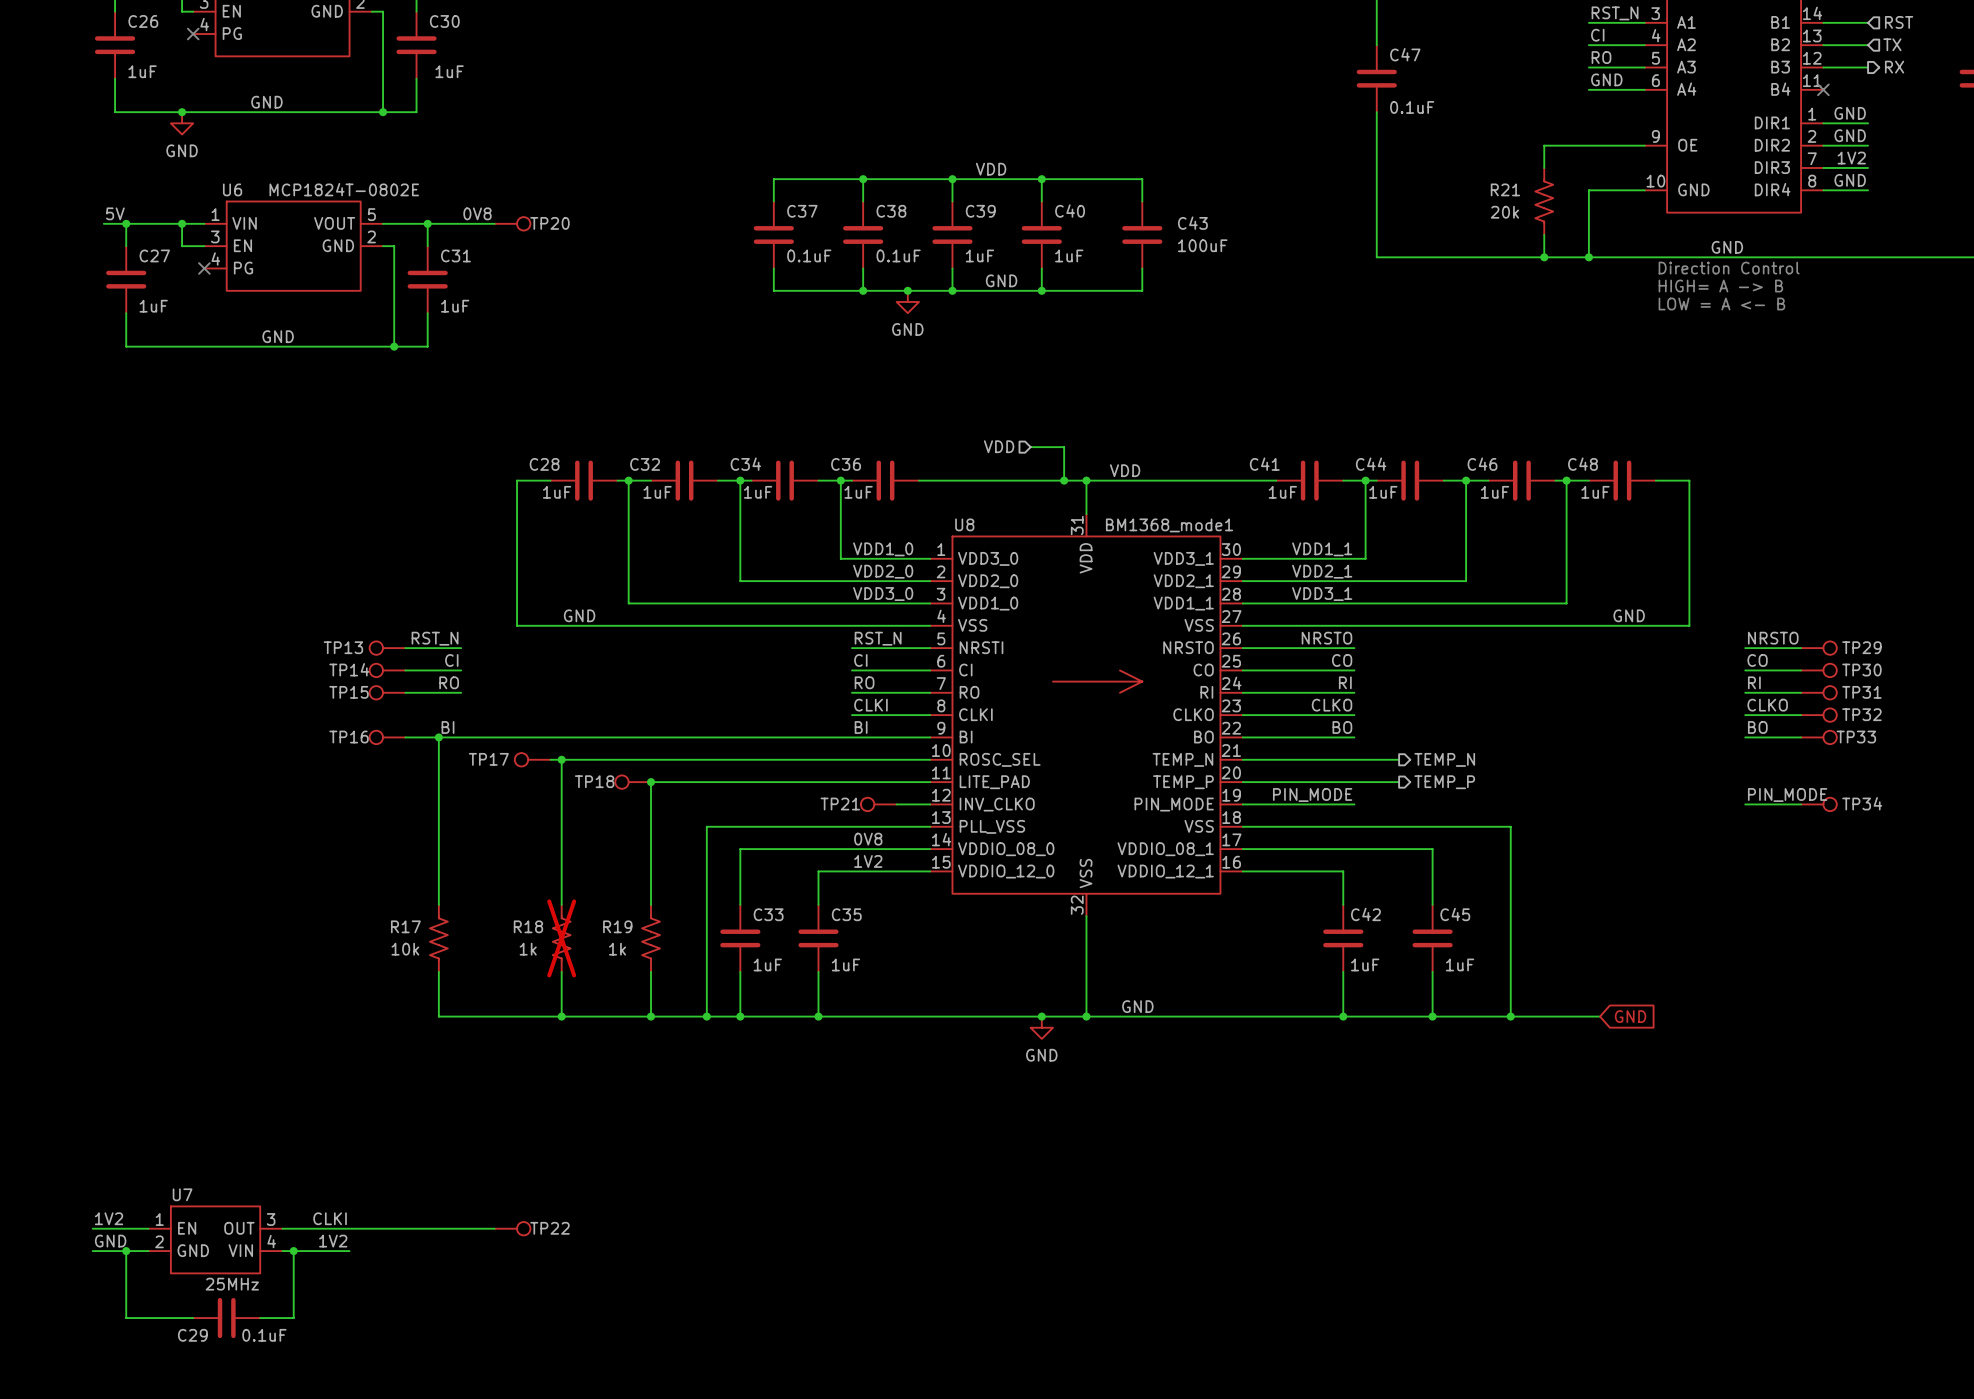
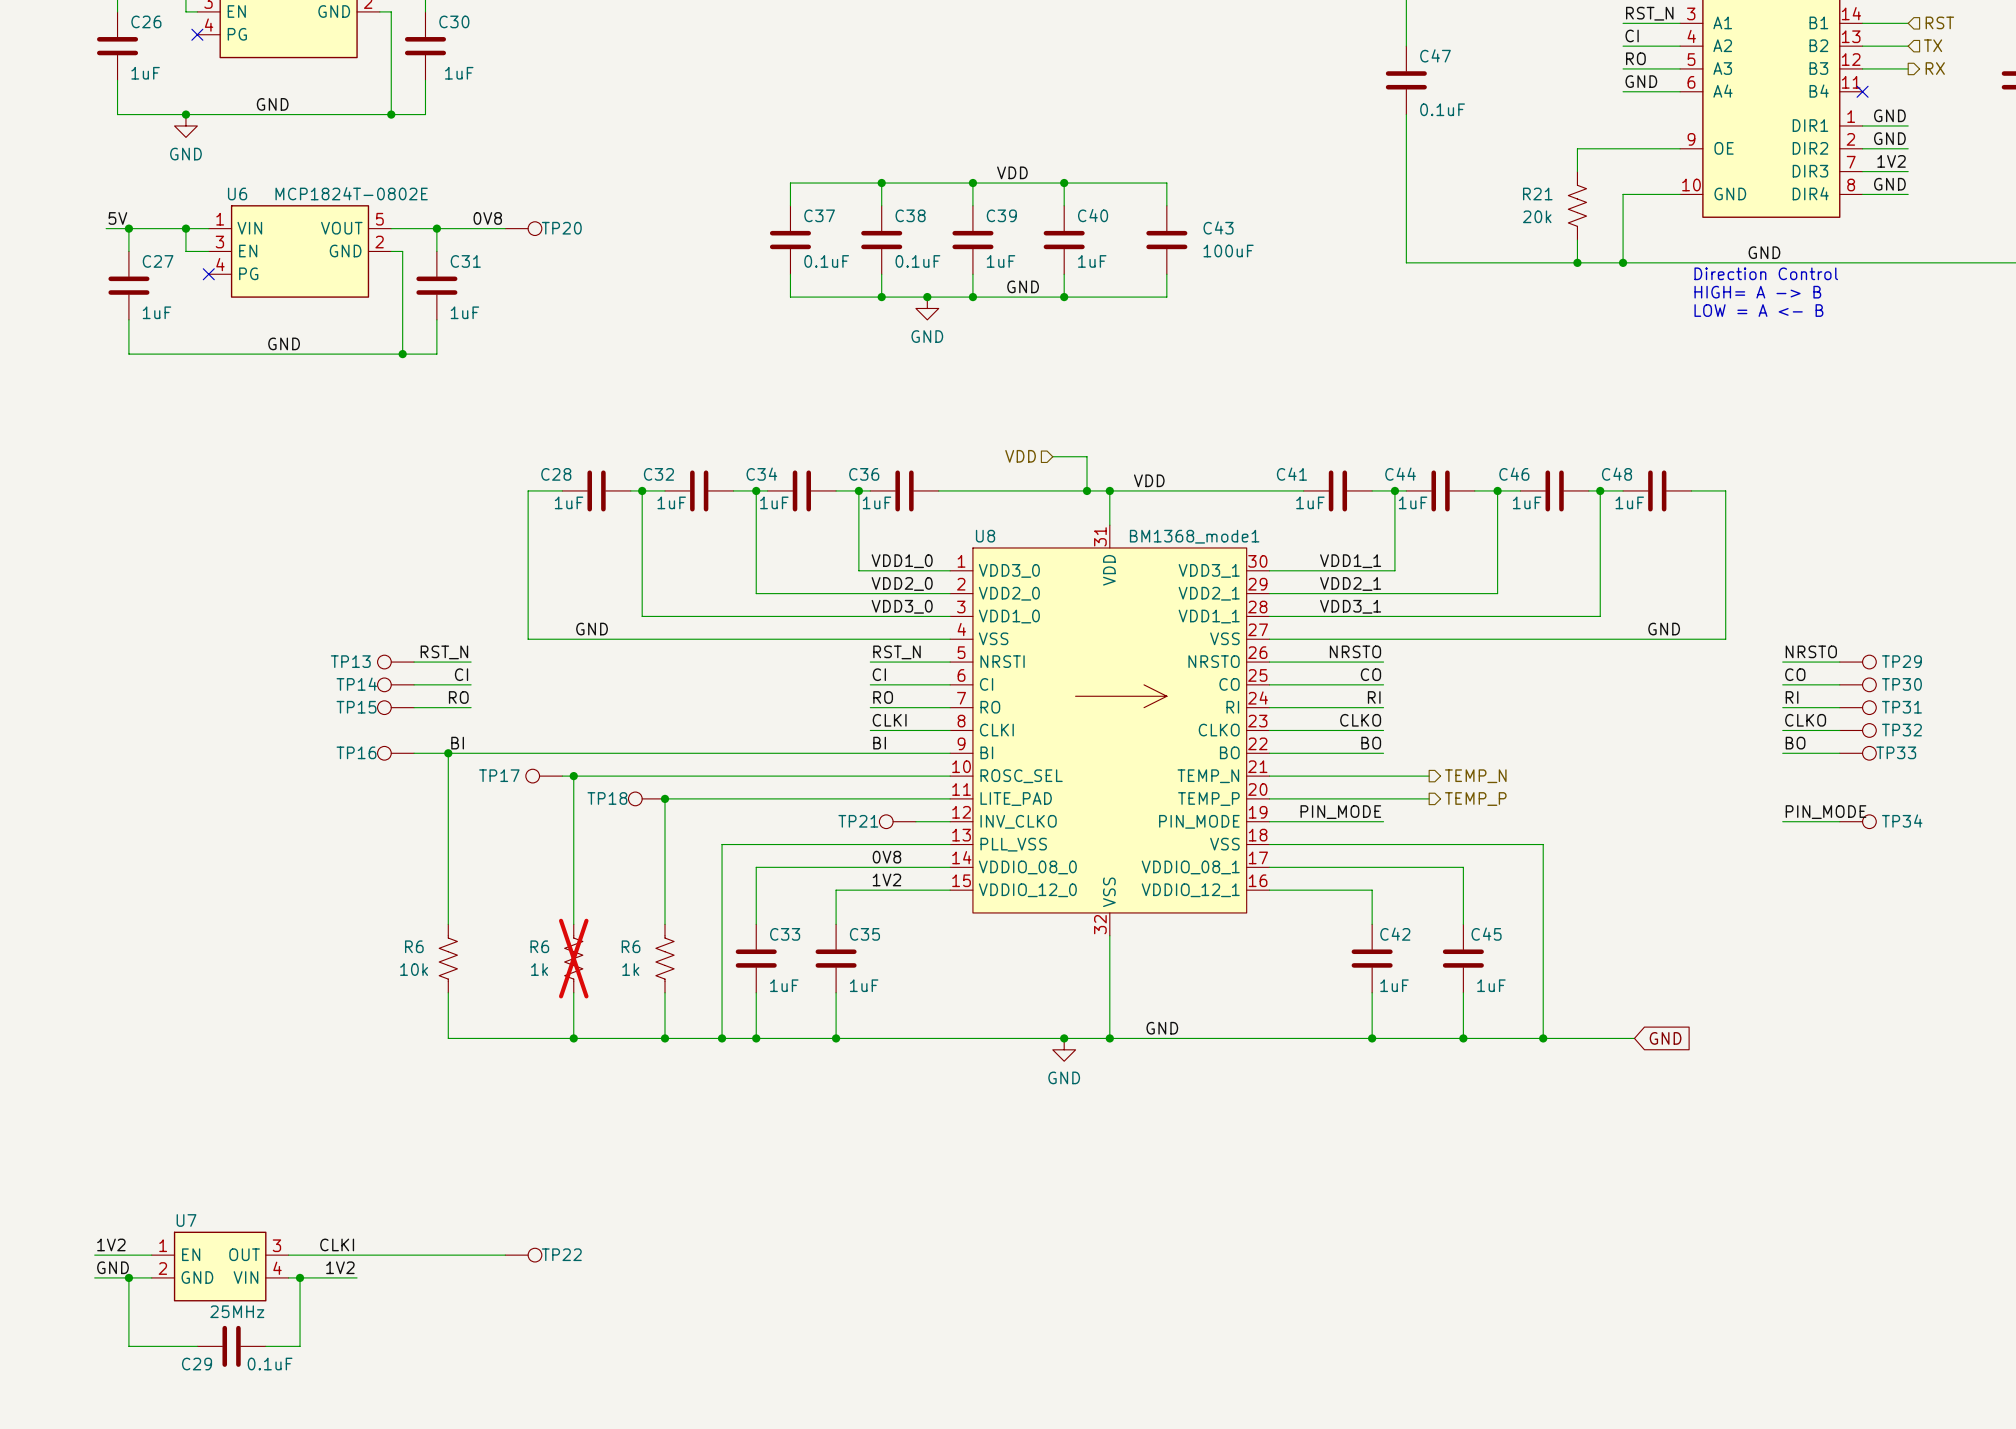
R17 name: R17 (405, 926) -> R6 (414, 946)
R18 name: R18 (528, 926) -> R6 (539, 946)
R19 name: R19 (617, 926) -> R6 (631, 946)

